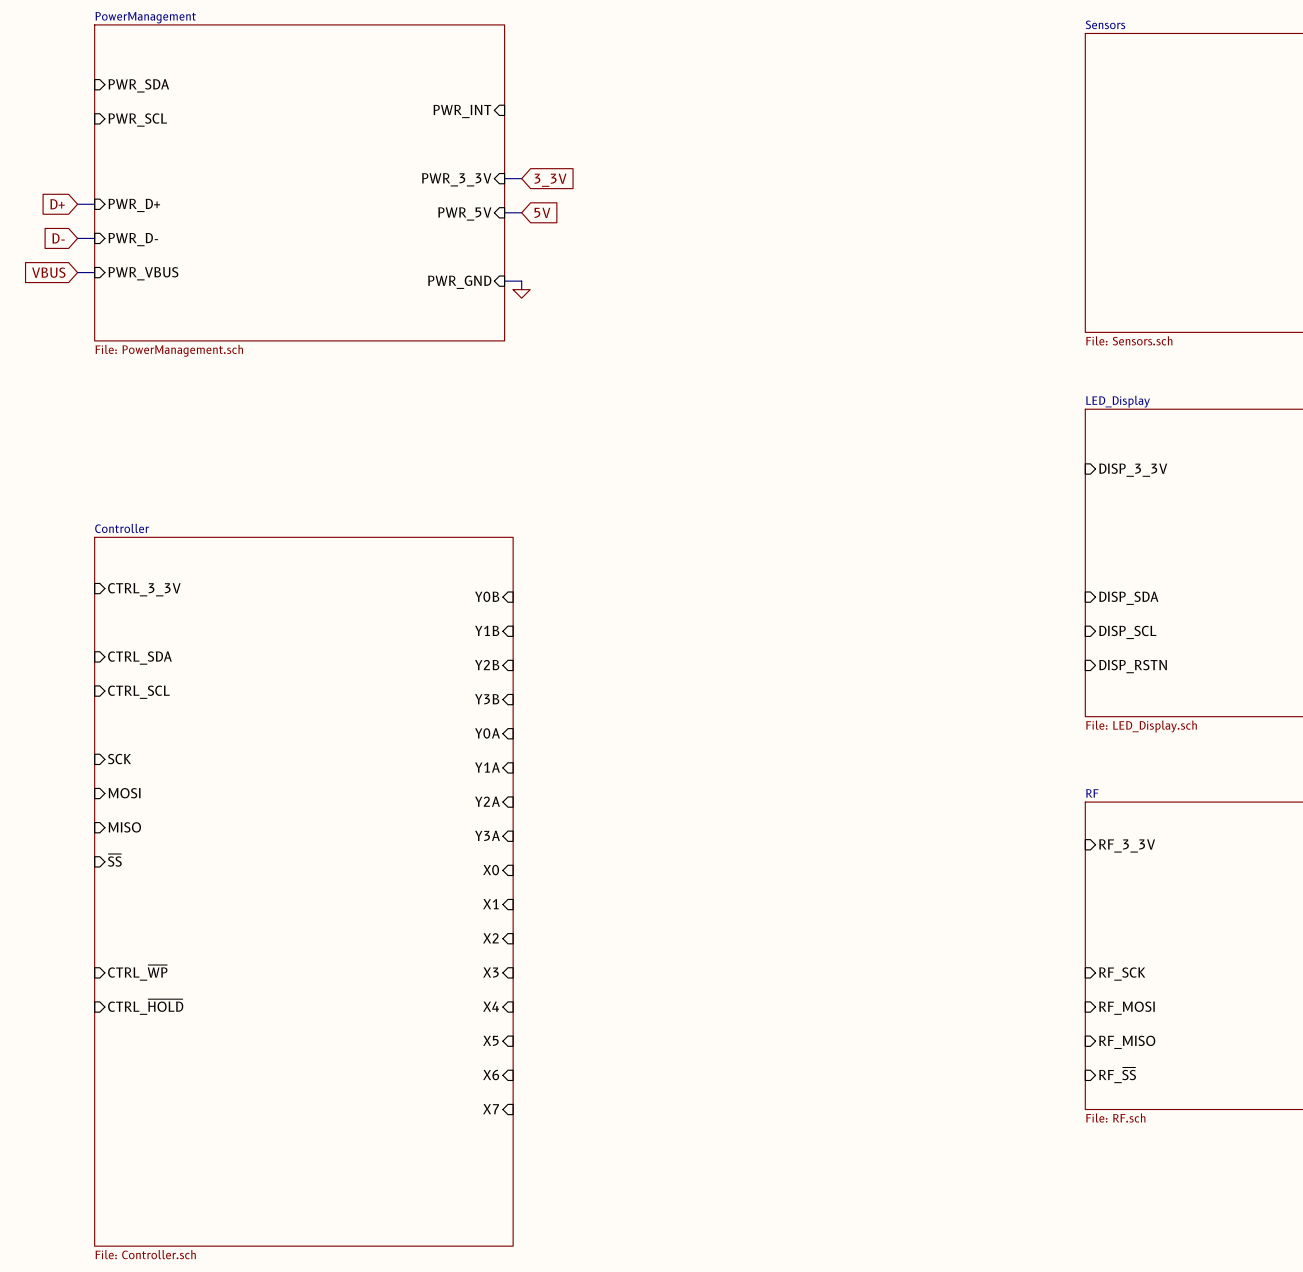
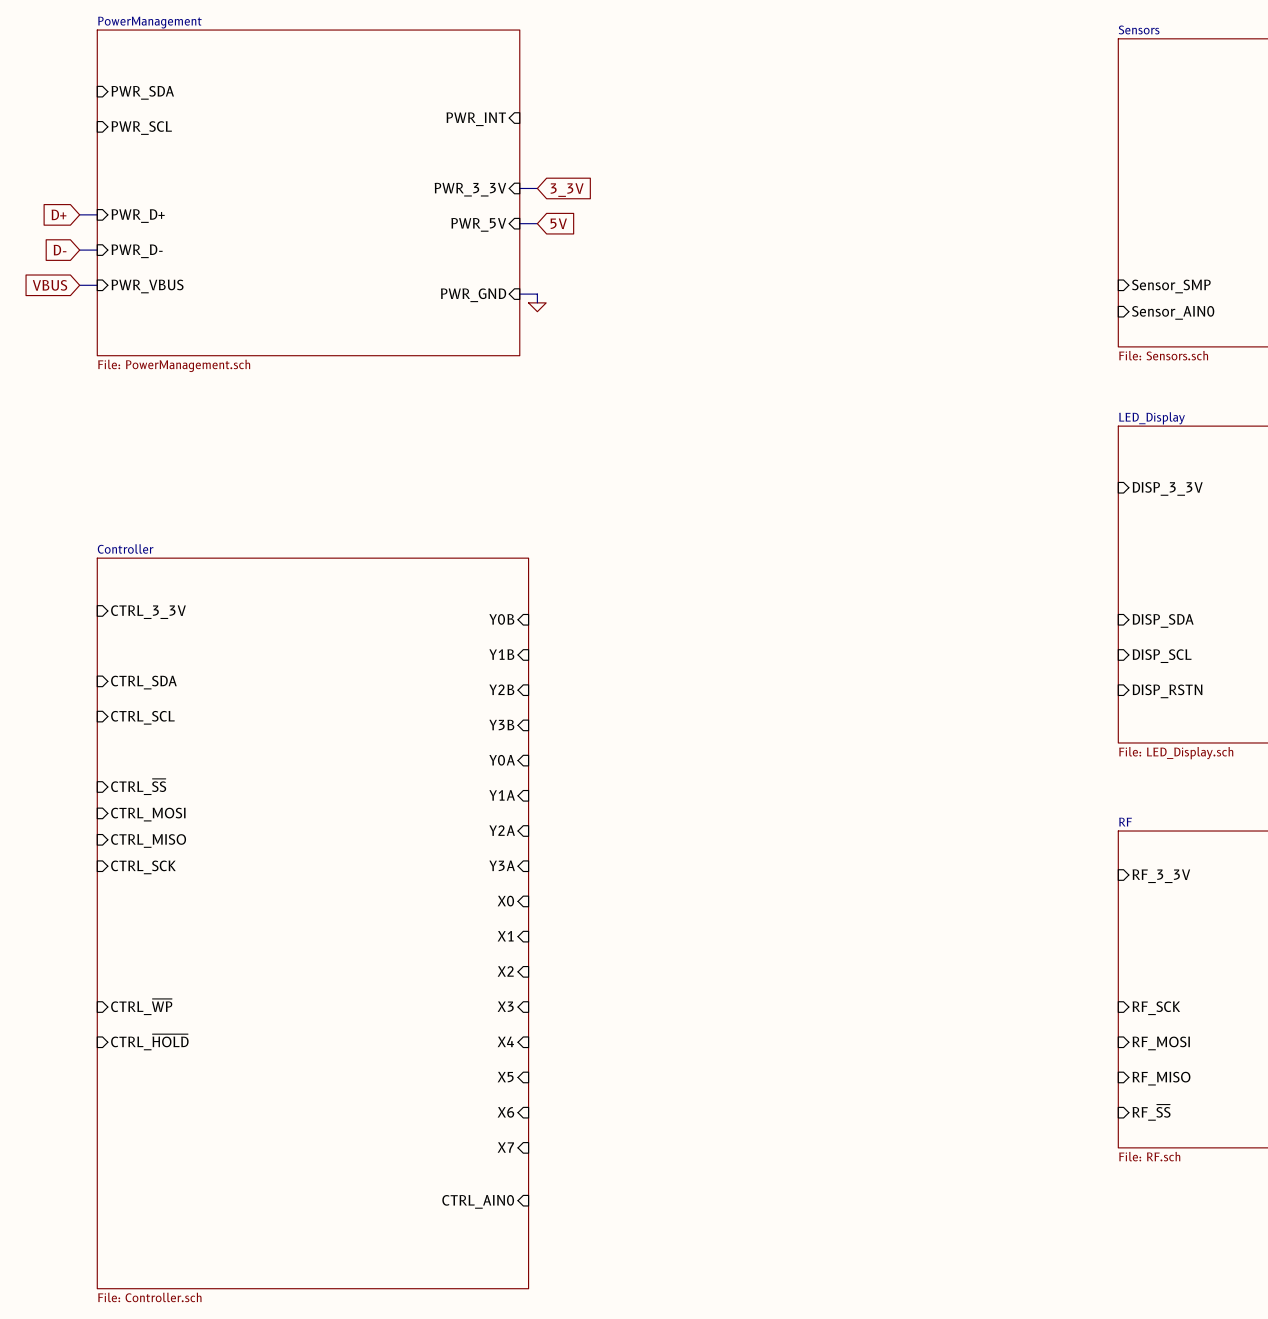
sheet pin: none -> Sensor_SMP (1171, 286)
sheet pin: none -> Sensor_AIN0 (1173, 312)
sheet pin: SCK (119, 759) -> CTRL_~{SS} (138, 786)
sheet pin: MOSI (124, 793) -> CTRL_MOSI (148, 814)
sheet pin: MISO (124, 827) -> CTRL_MISO (148, 840)
sheet pin: none -> CTRL_SCK (143, 867)
sheet pin: ~{SS} (114, 860) -> none
sheet pin: none -> CTRL_AIN0 (478, 1201)

